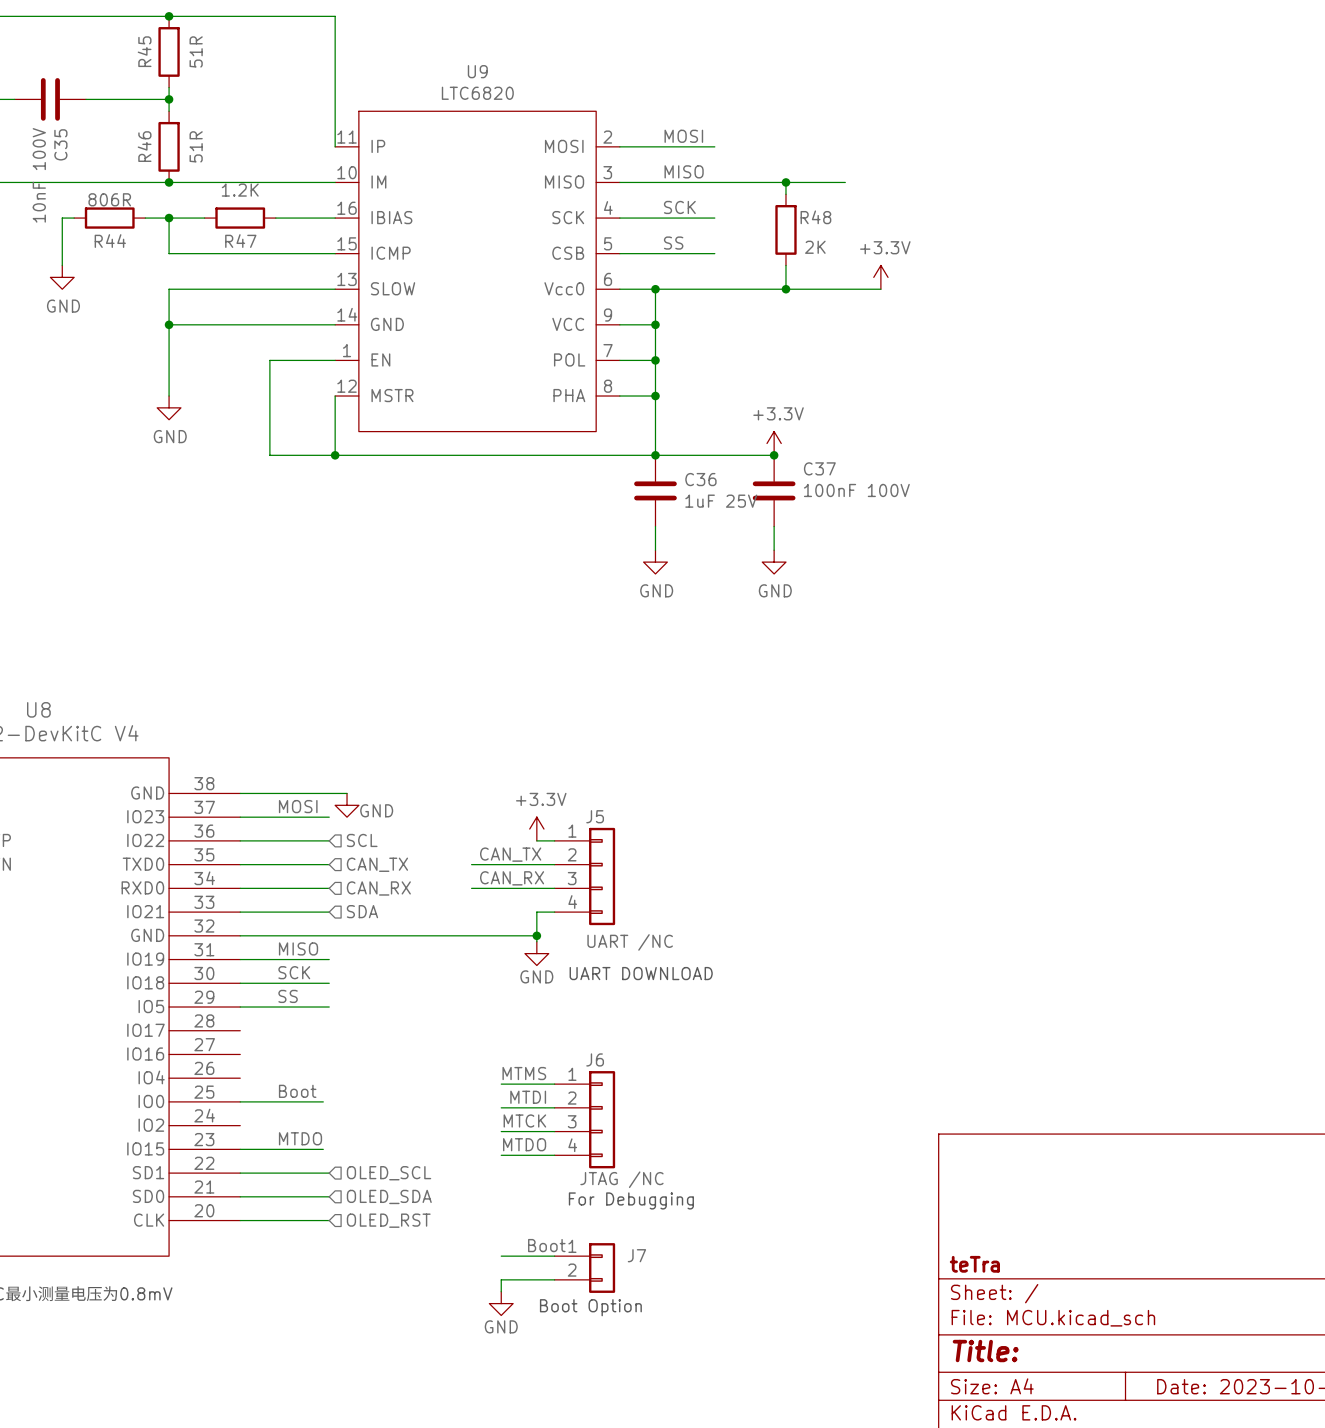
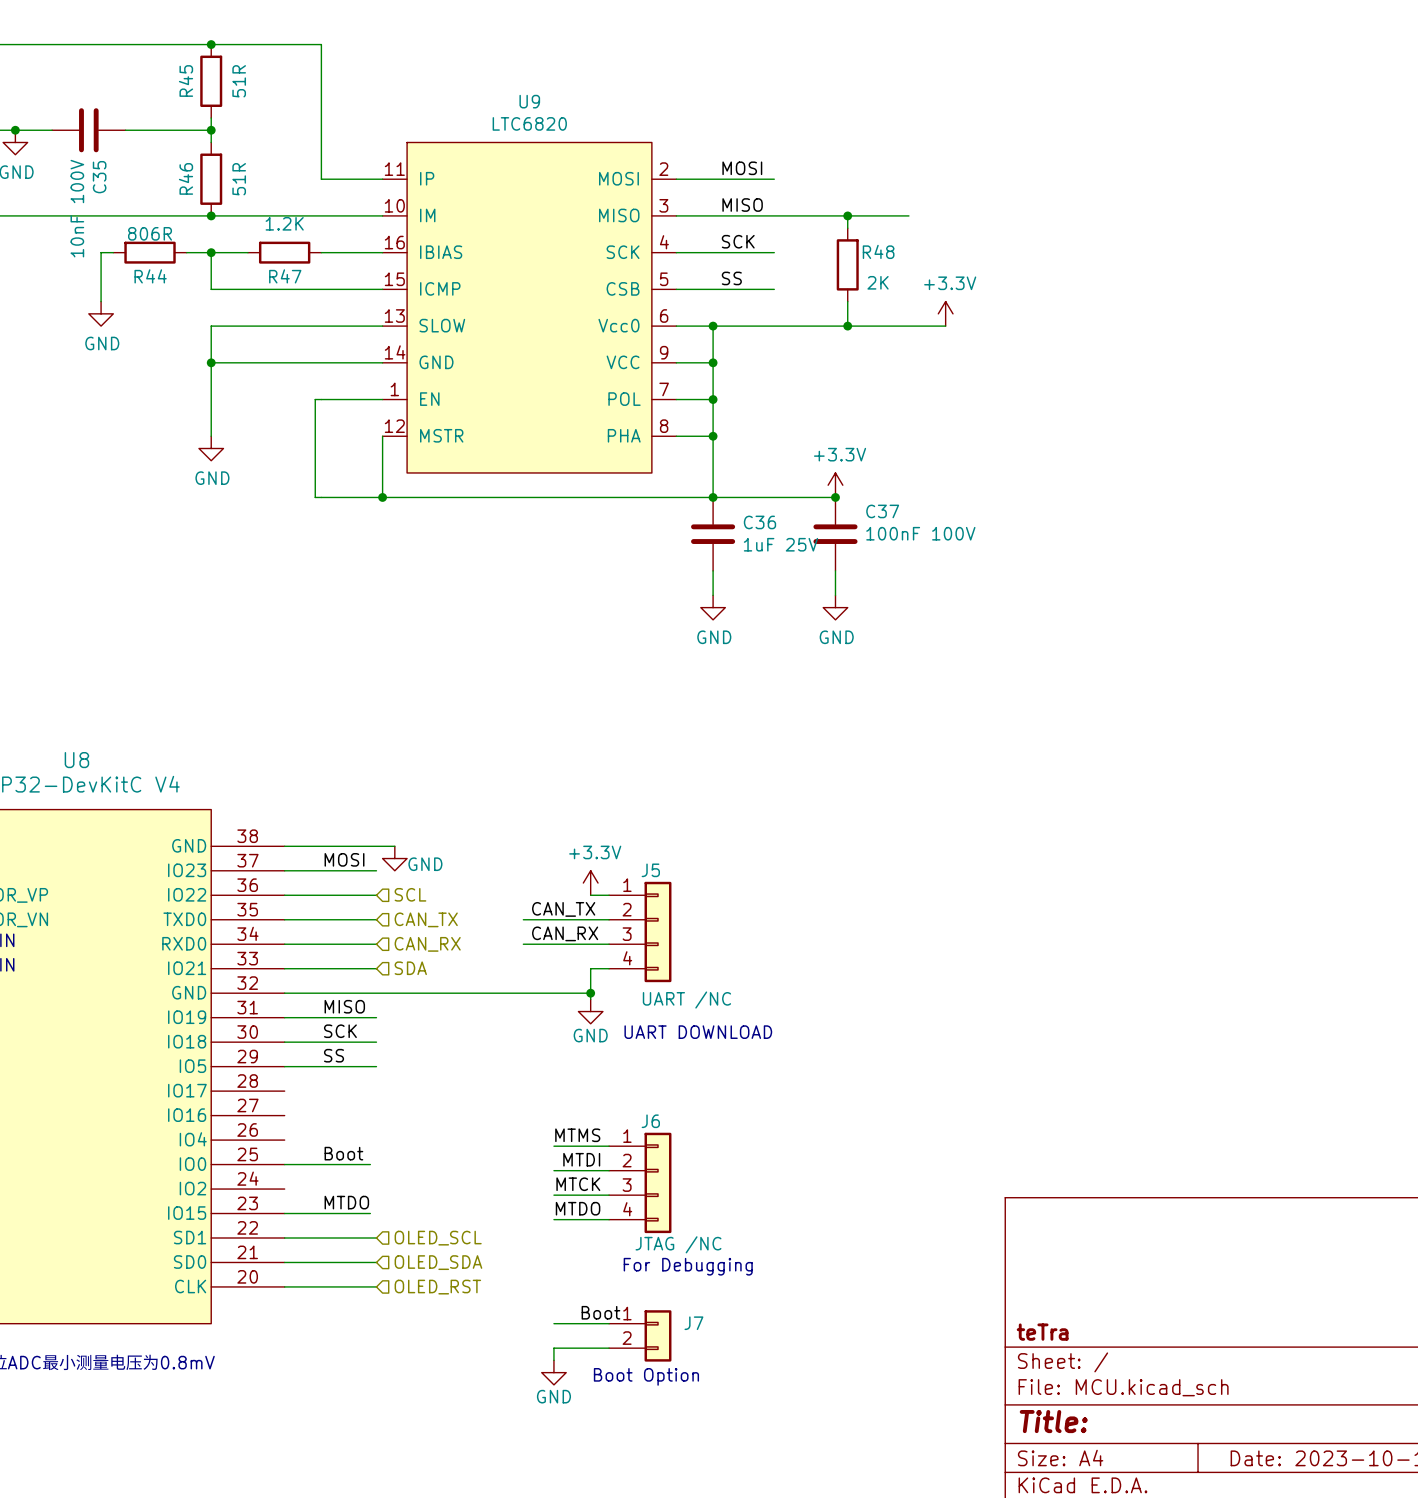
wire: (275, 16) (335, 16) (335, 146) -> (321, 44) (321, 179) (382, 179)

